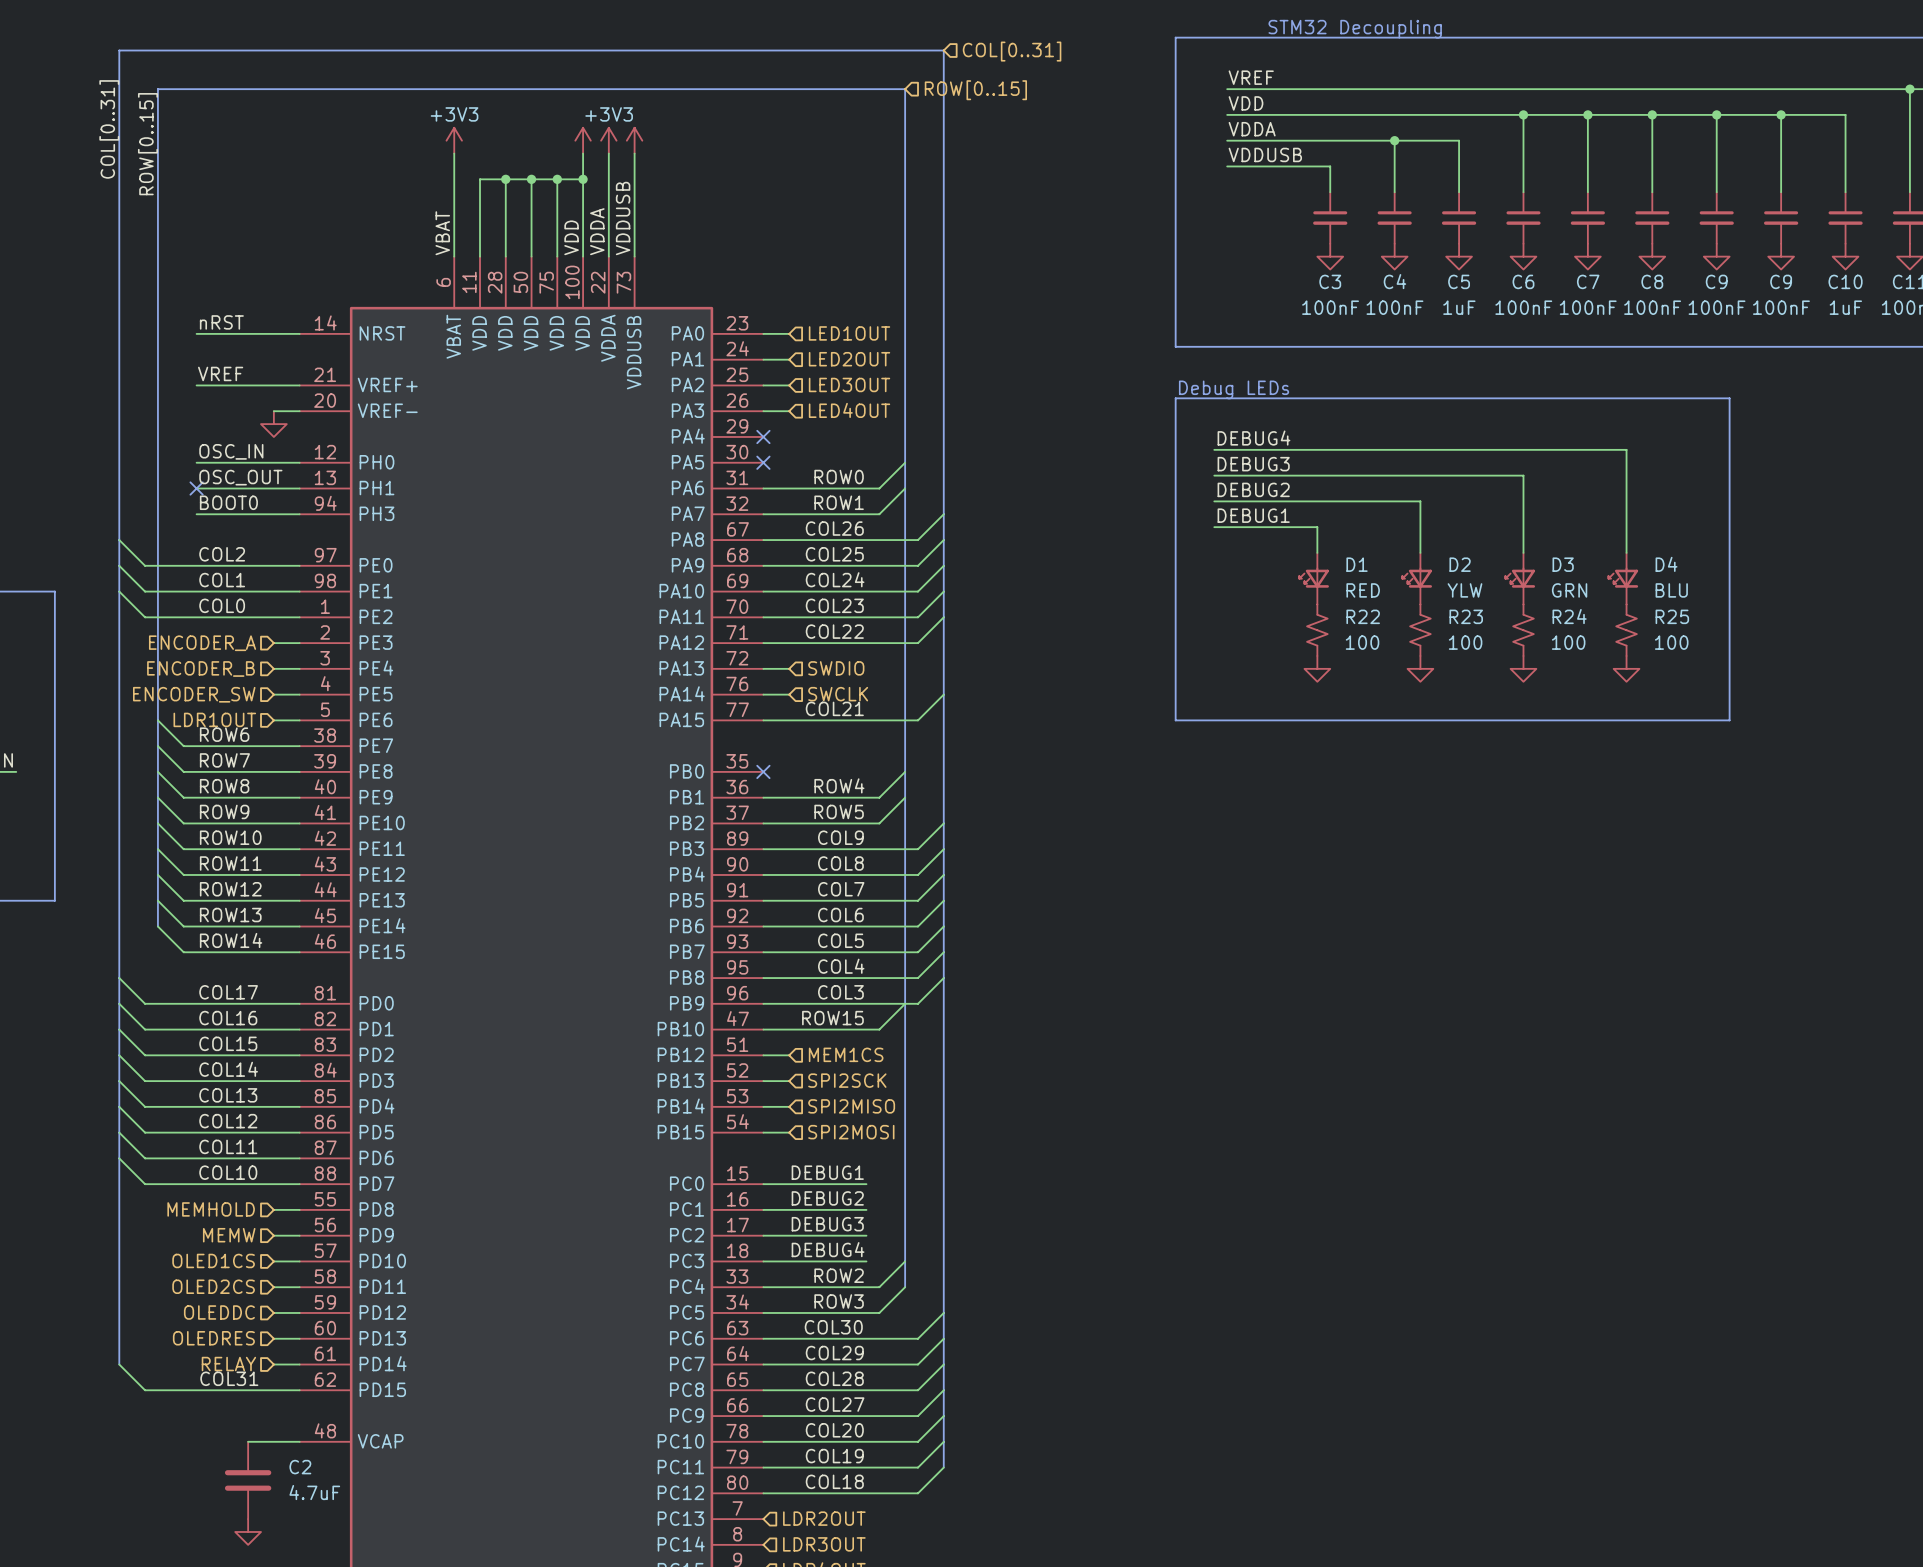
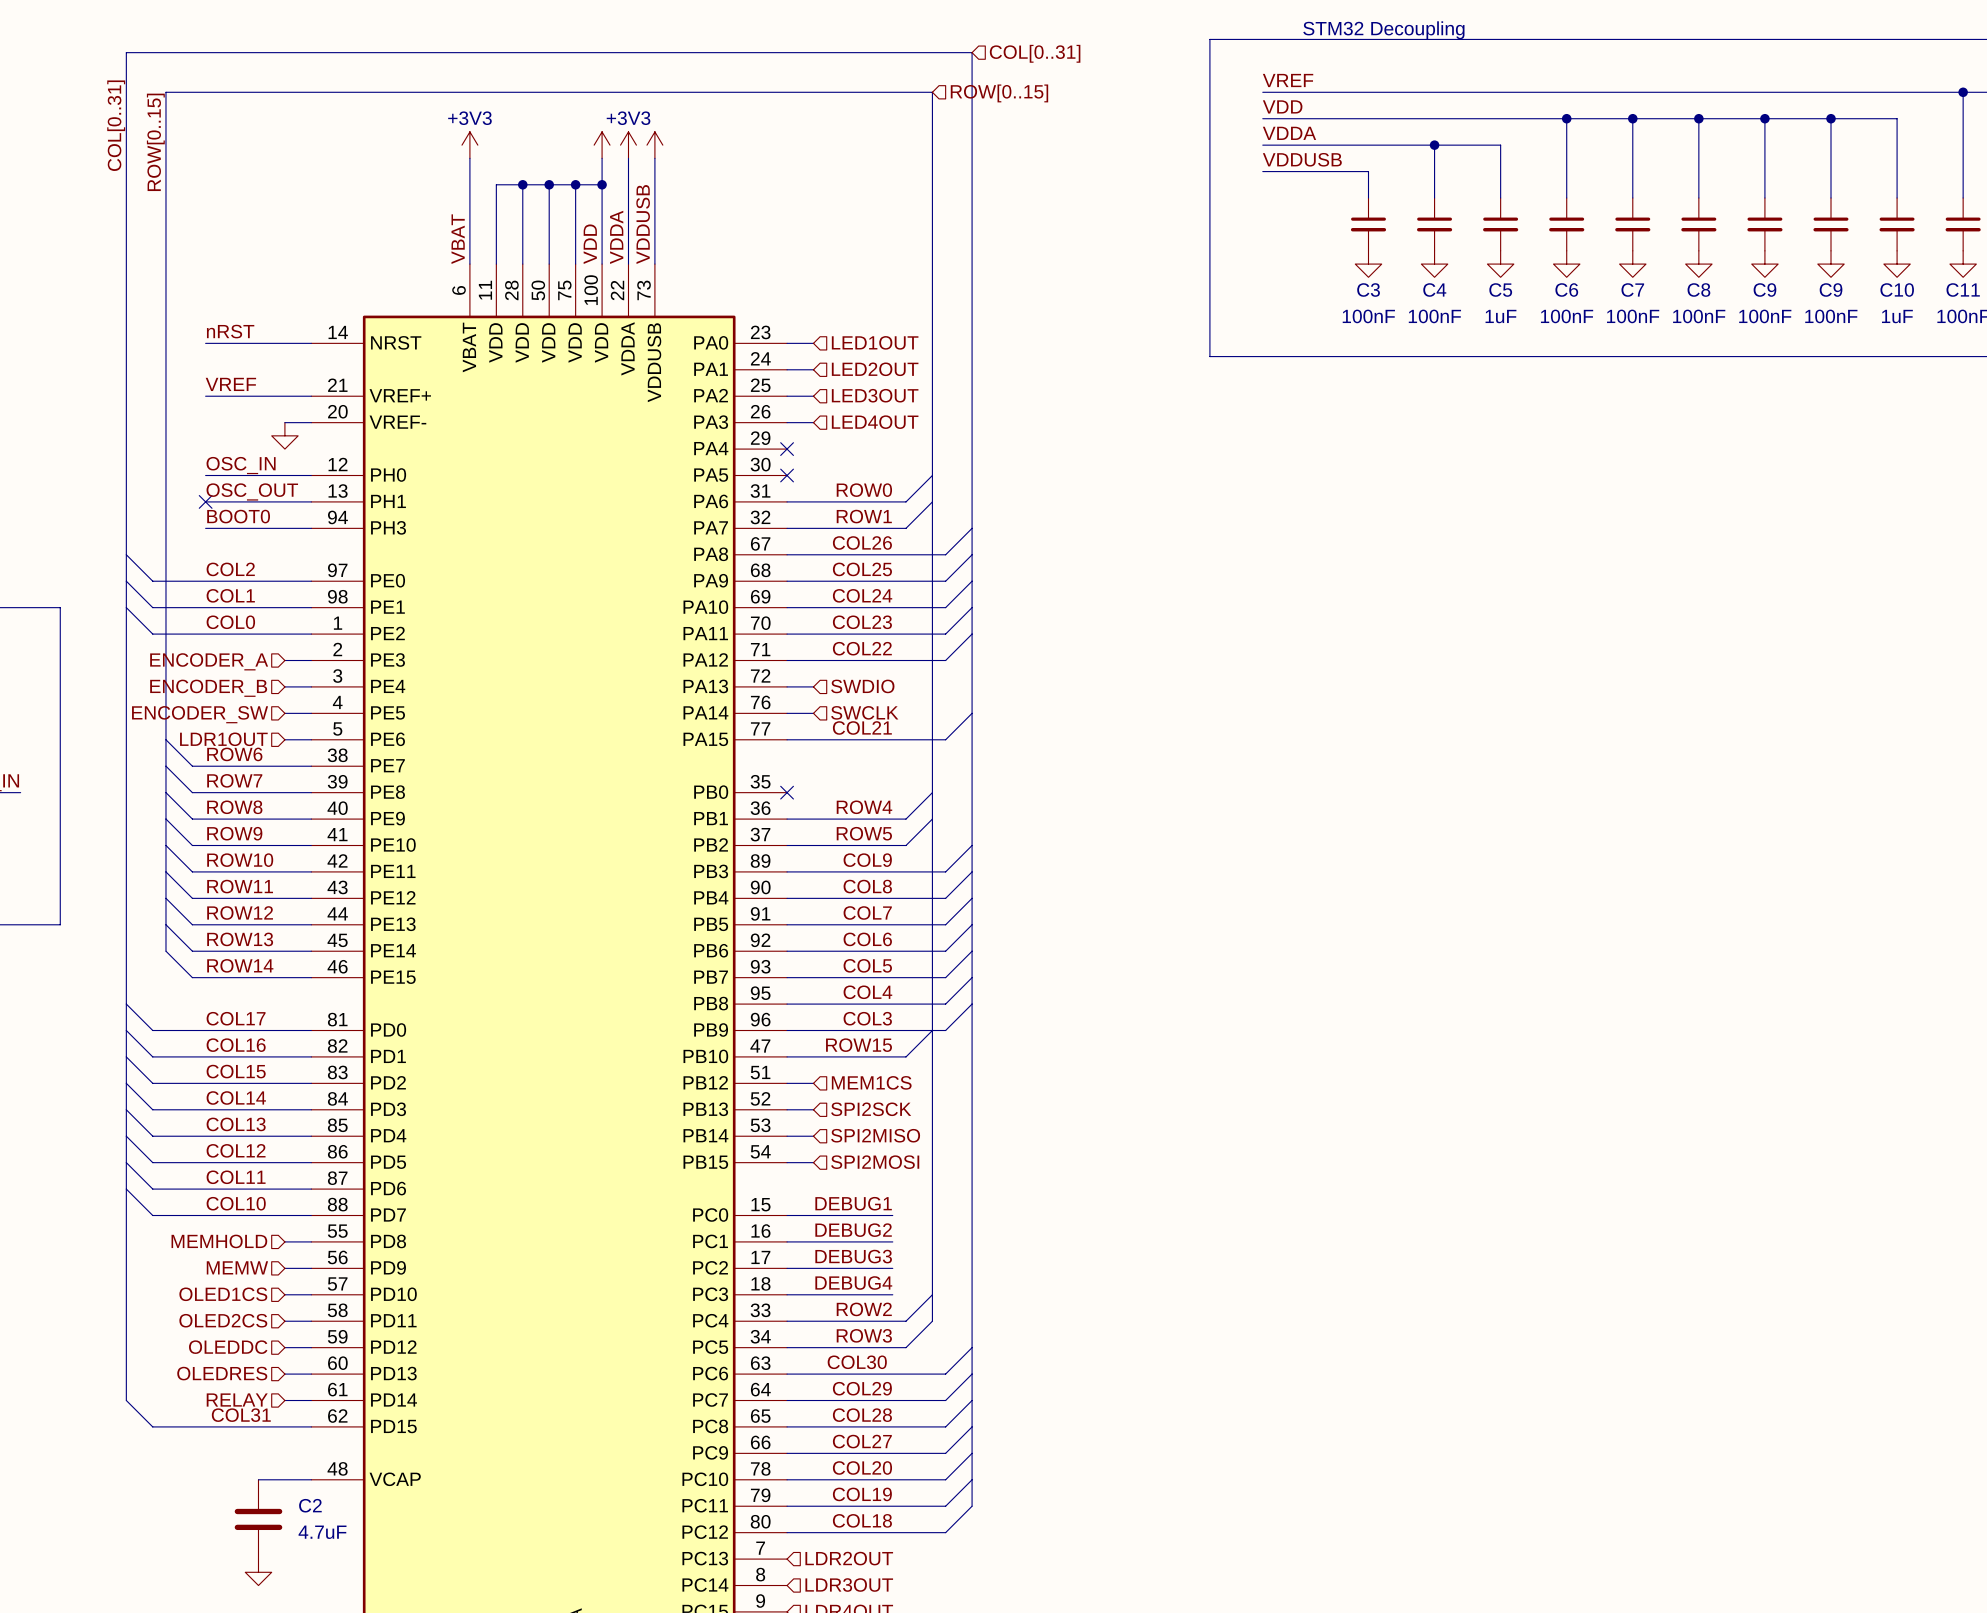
text: Debug LEDs (1234, 389) -> none
line: (1175, 398) (1729, 398) (1729, 720) (1175, 720) (1175, 398) -> none
label: DEBUG4 (1253, 438) -> none
wire: (1214, 449) (1626, 449) (1626, 552) -> none
label: DEBUG3 (1253, 464) -> none
wire: (1214, 475) (1523, 475) (1523, 552) -> none
label: DEBUG2 (1253, 489) -> none
wire: (1214, 501) (1420, 501) (1420, 552) -> none
label: DEBUG1 (1253, 515) -> none
wire: (1214, 527) (1317, 527) (1317, 552) -> none
D1: RED (1314, 578) -> none
D2: YLW (1417, 578) -> none
D3: GRN (1520, 578) -> none
D4: BLU (1623, 578) -> none
R22: 100 (1317, 630) -> none
R23: 100 (1420, 630) -> none
R24: 100 (1523, 630) -> none
R25: 100 (1626, 630) -> none
power symbol: (1317, 668) -> none
power symbol: (1420, 668) -> none
power symbol: (1523, 668) -> none
power symbol: (1626, 668) -> none

